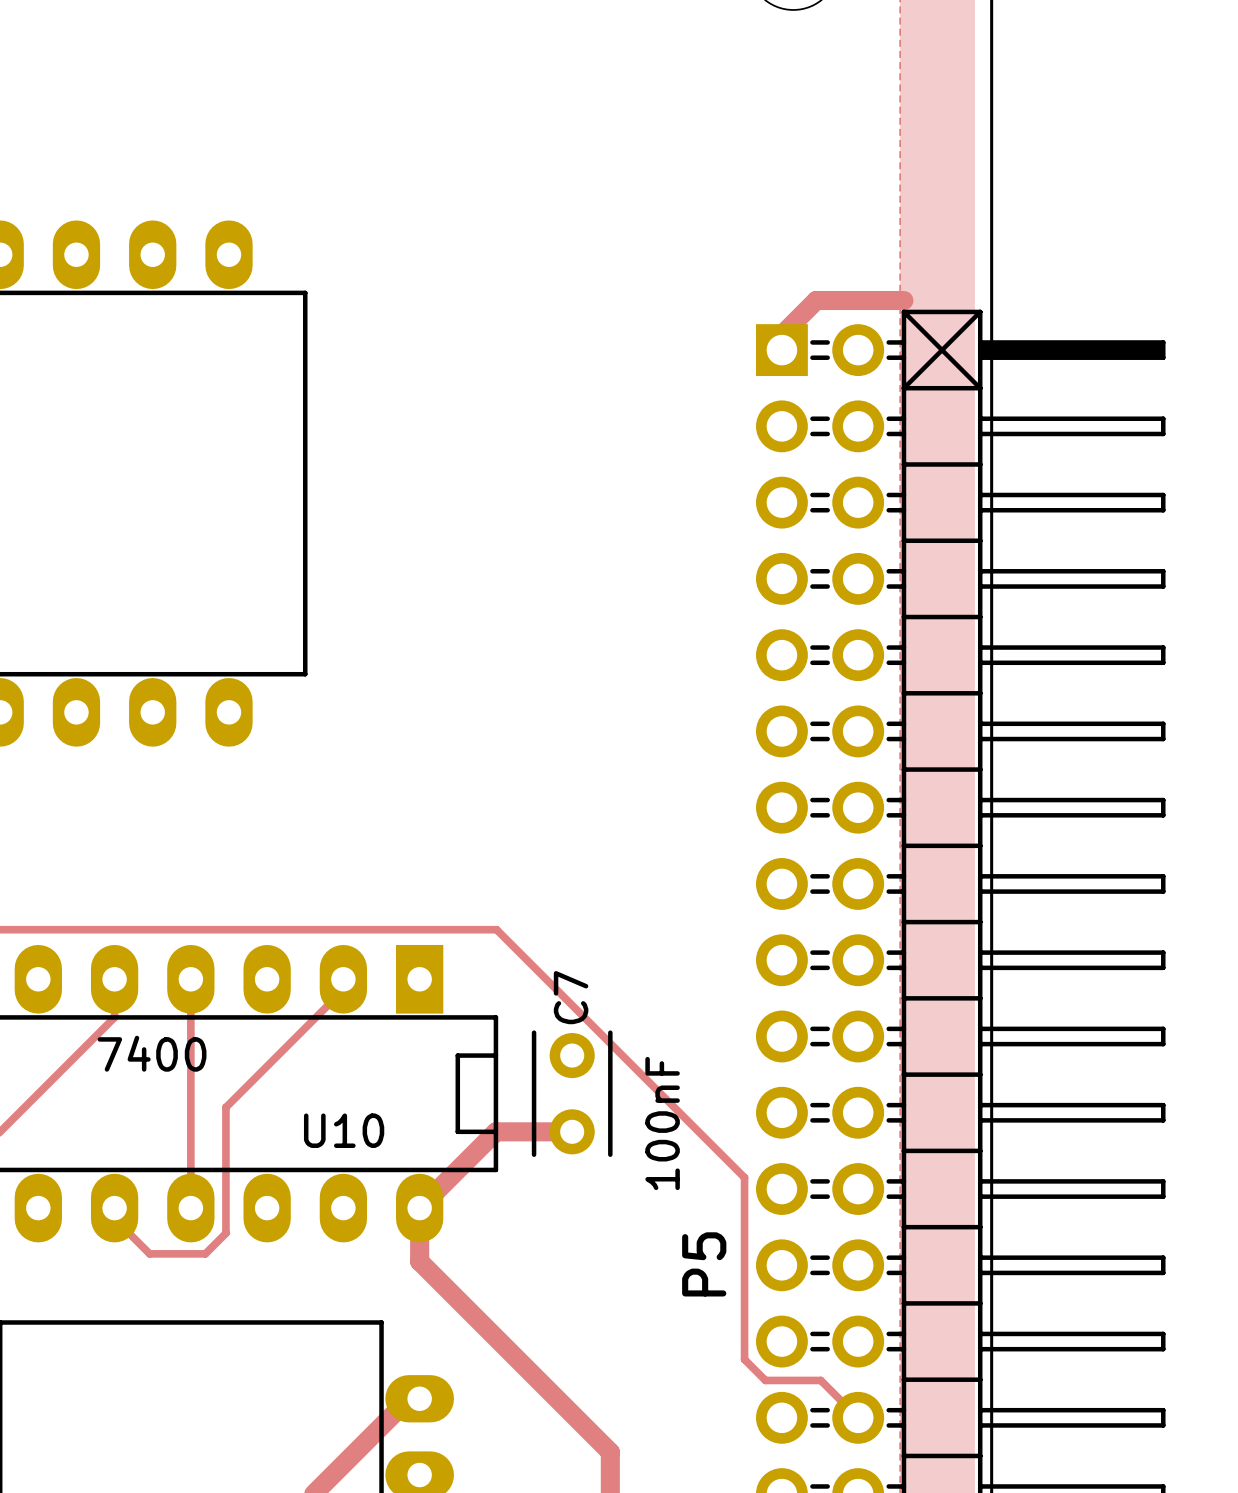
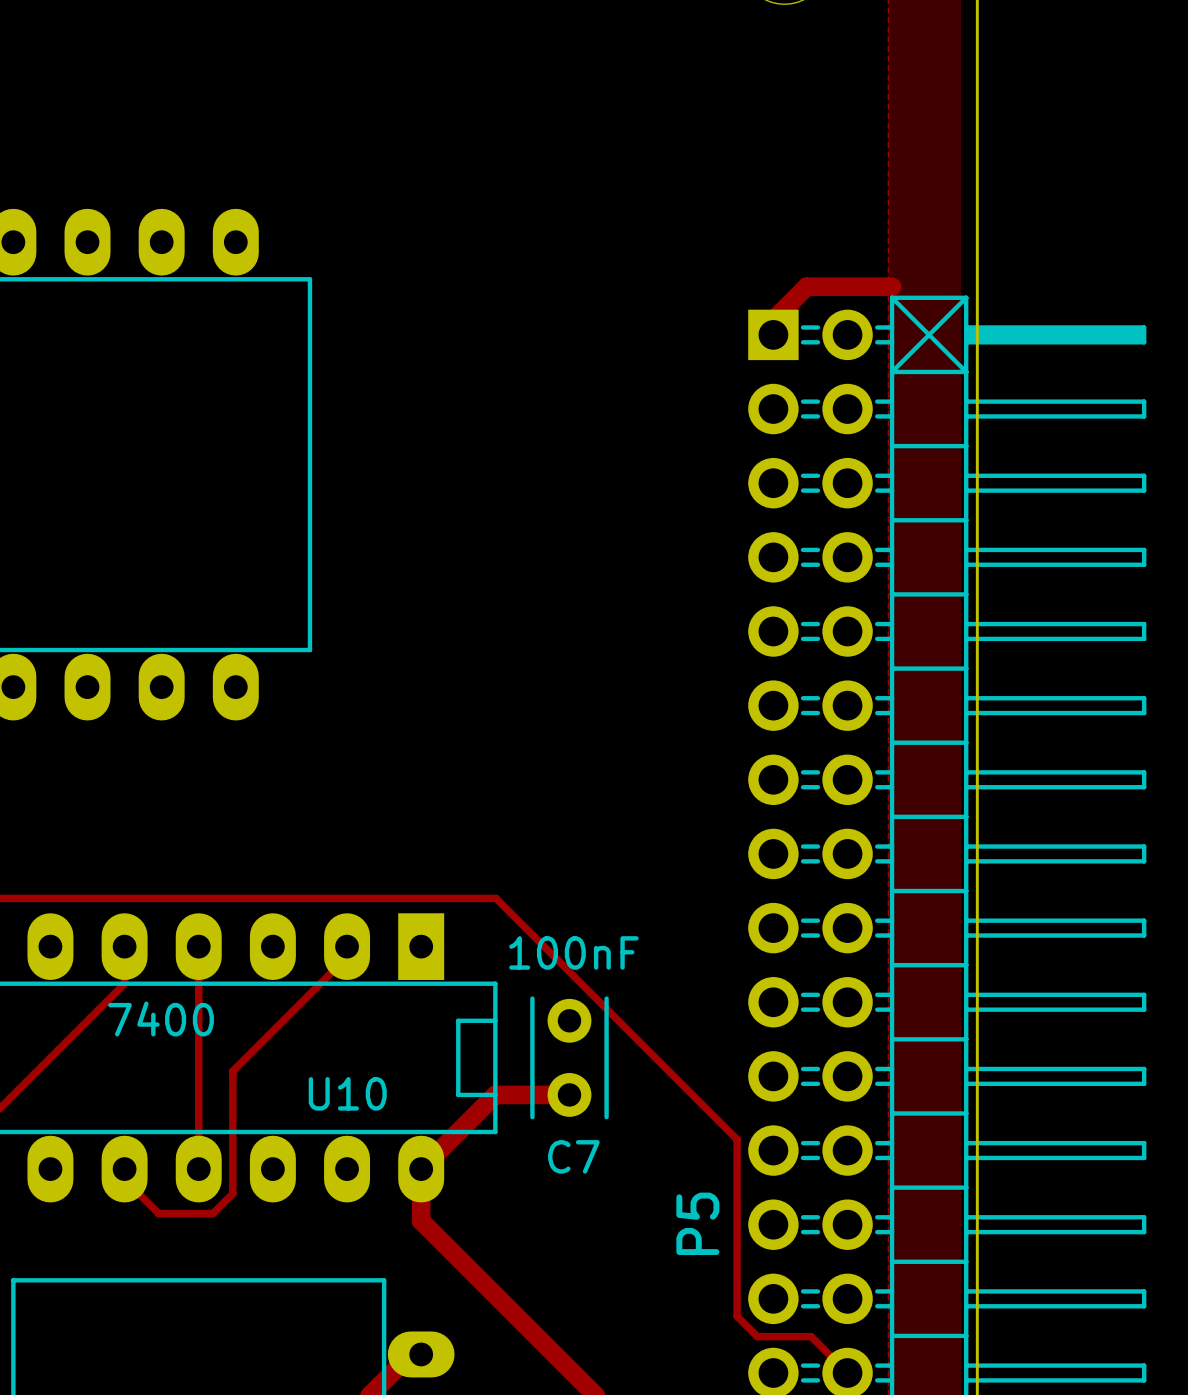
C7 name rotation: 0° (571, 997) -> 90° clockwise (573, 1156)
C7 name position: C7 (571, 997) -> C7 (573, 1156)
C7 value rotation: 0° (662, 1123) -> 90° clockwise (573, 952)
C7 value position: 100nF (662, 1123) -> 100nF (573, 952)

